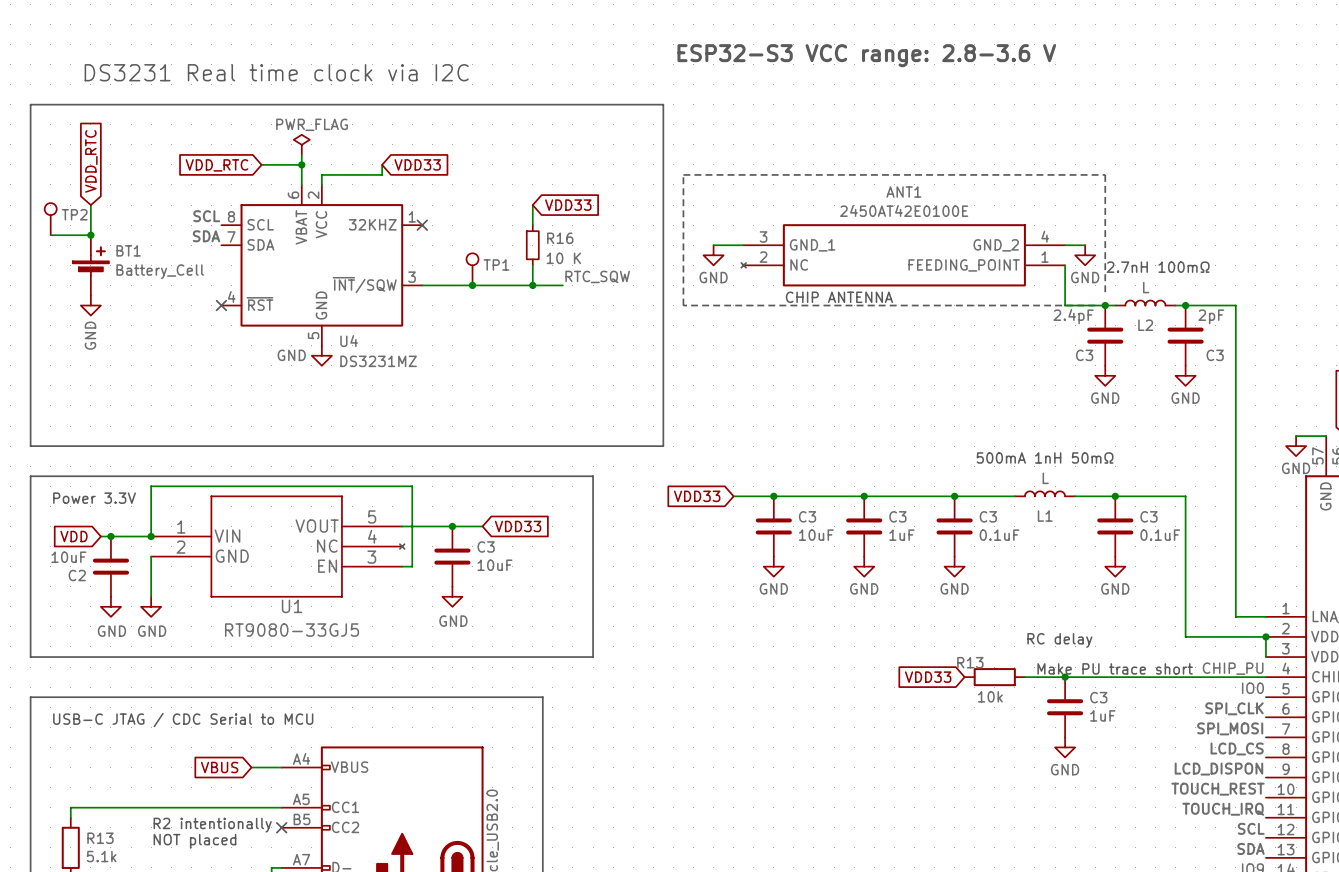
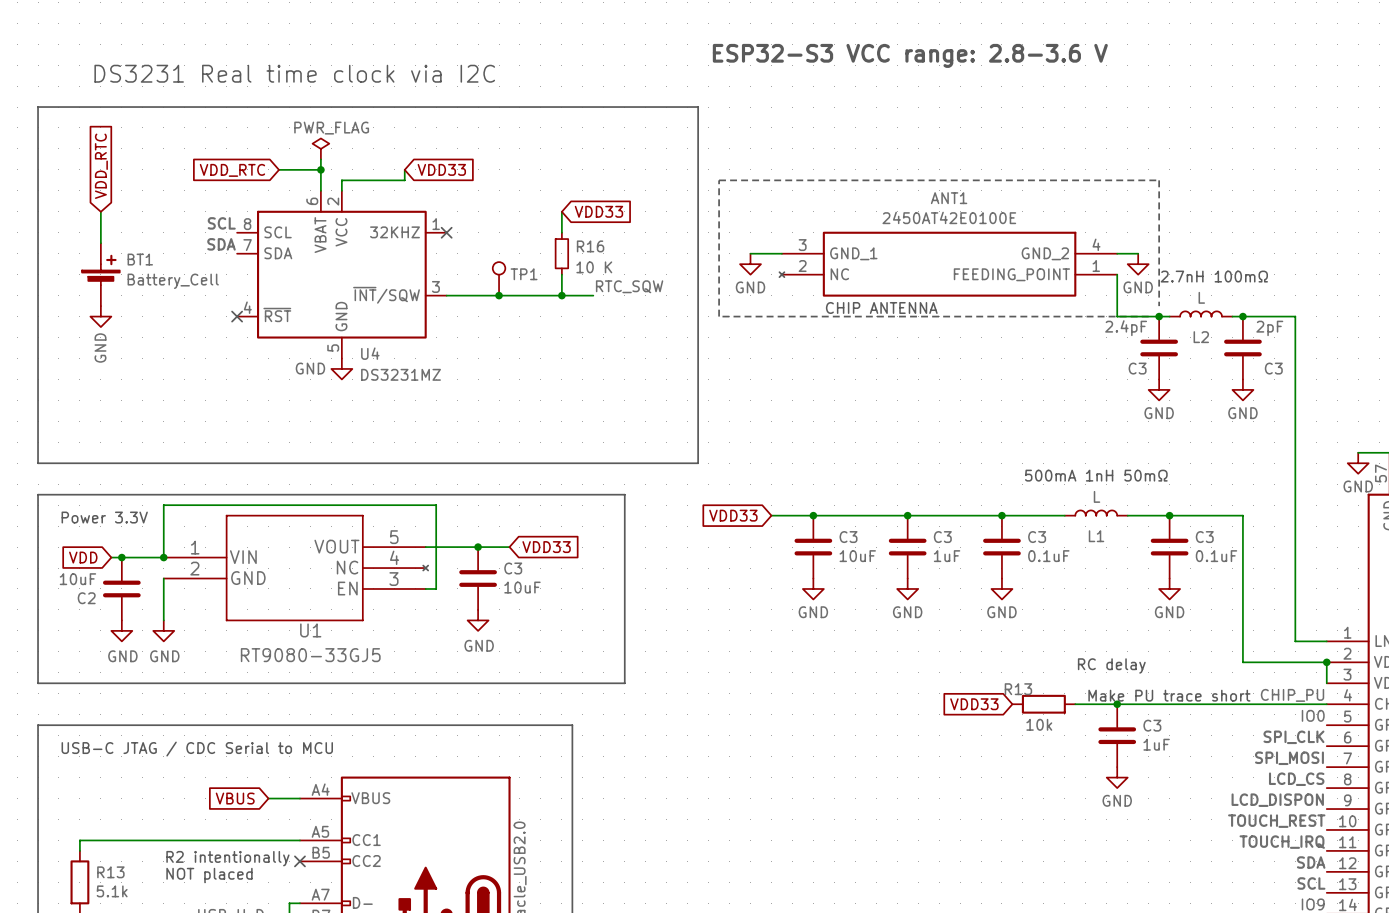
TP2: (50, 219) -> none
wire: (50, 235) (90, 235) -> none
junction: (90, 235) -> none
label: SCL (1251, 828) -> SDA (1311, 862)
label: SDA (1250, 848) -> SCL (1311, 883)

